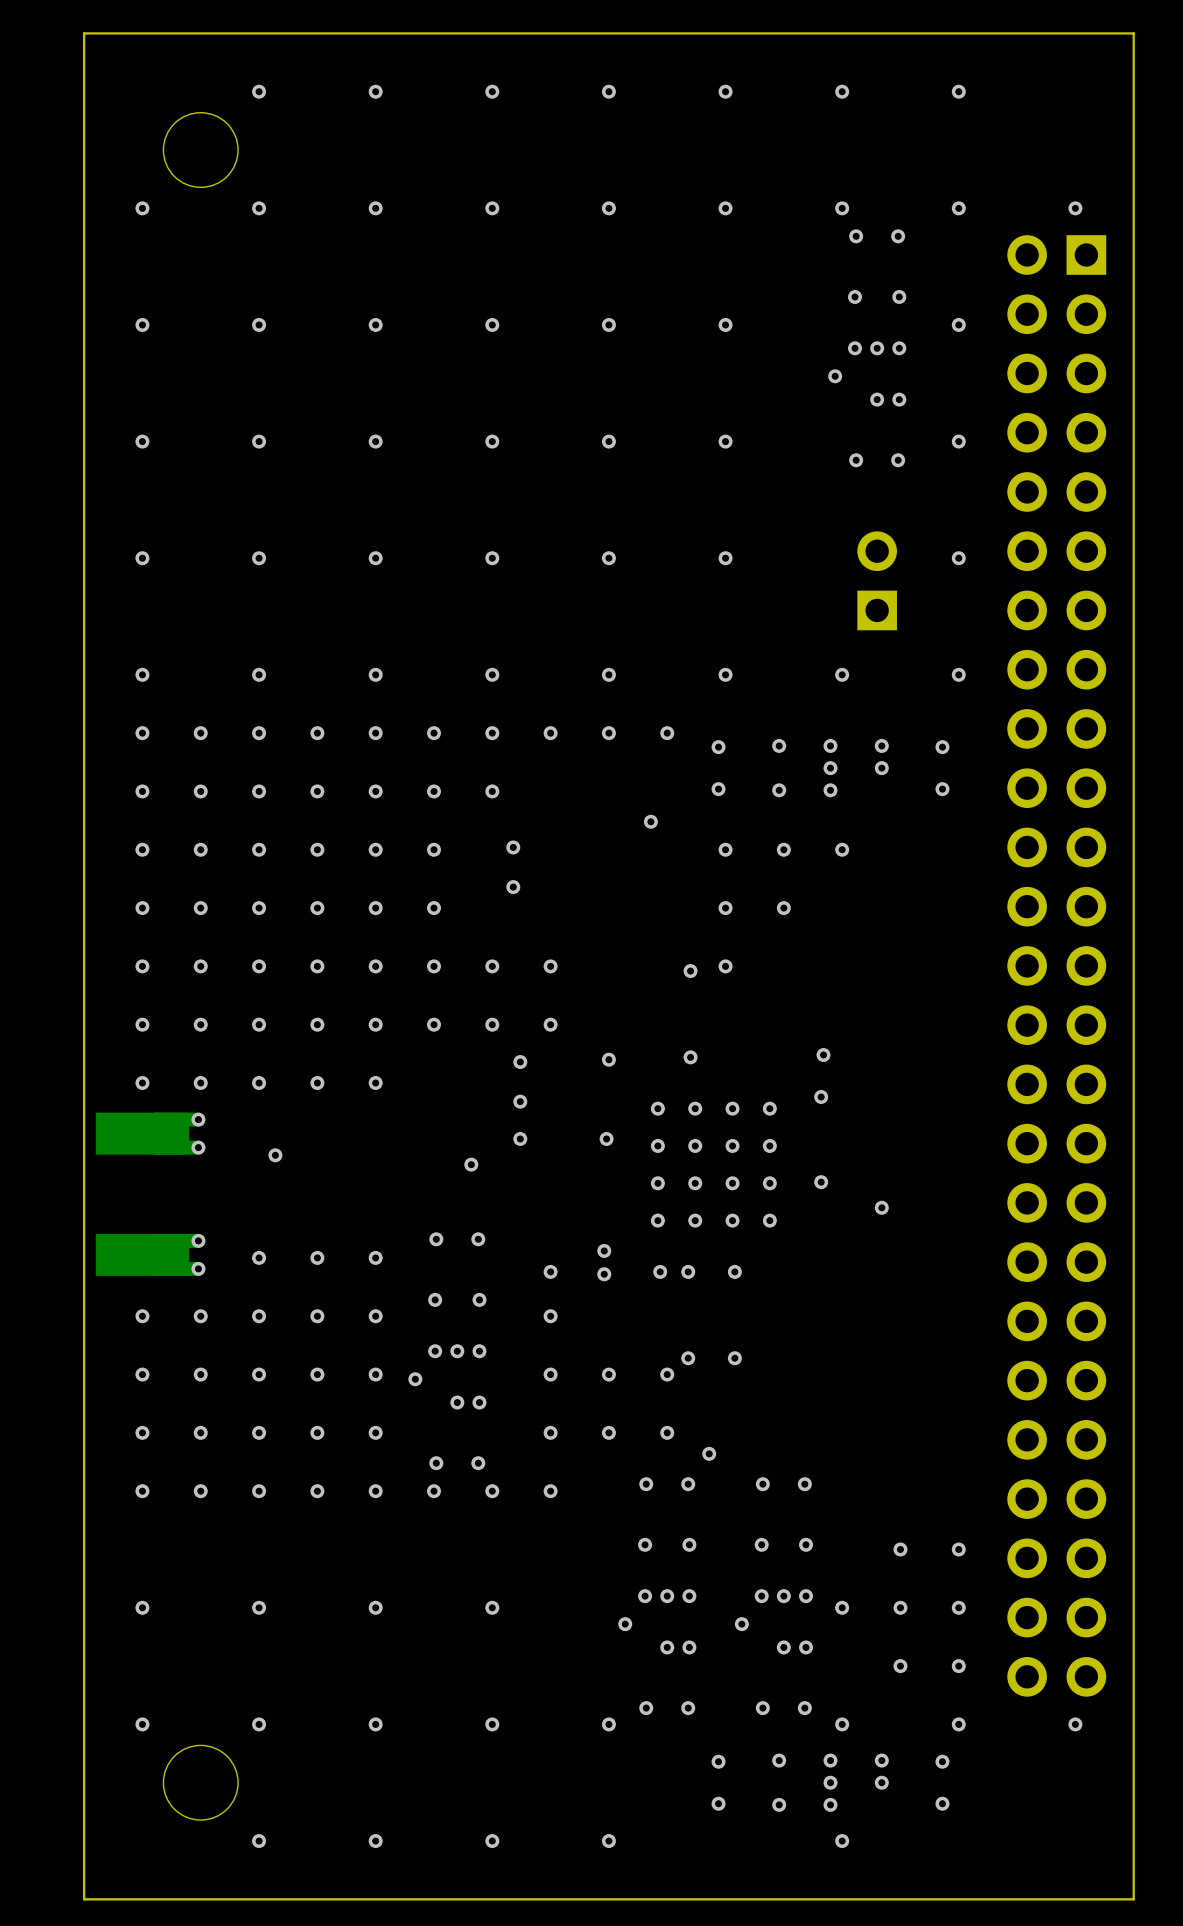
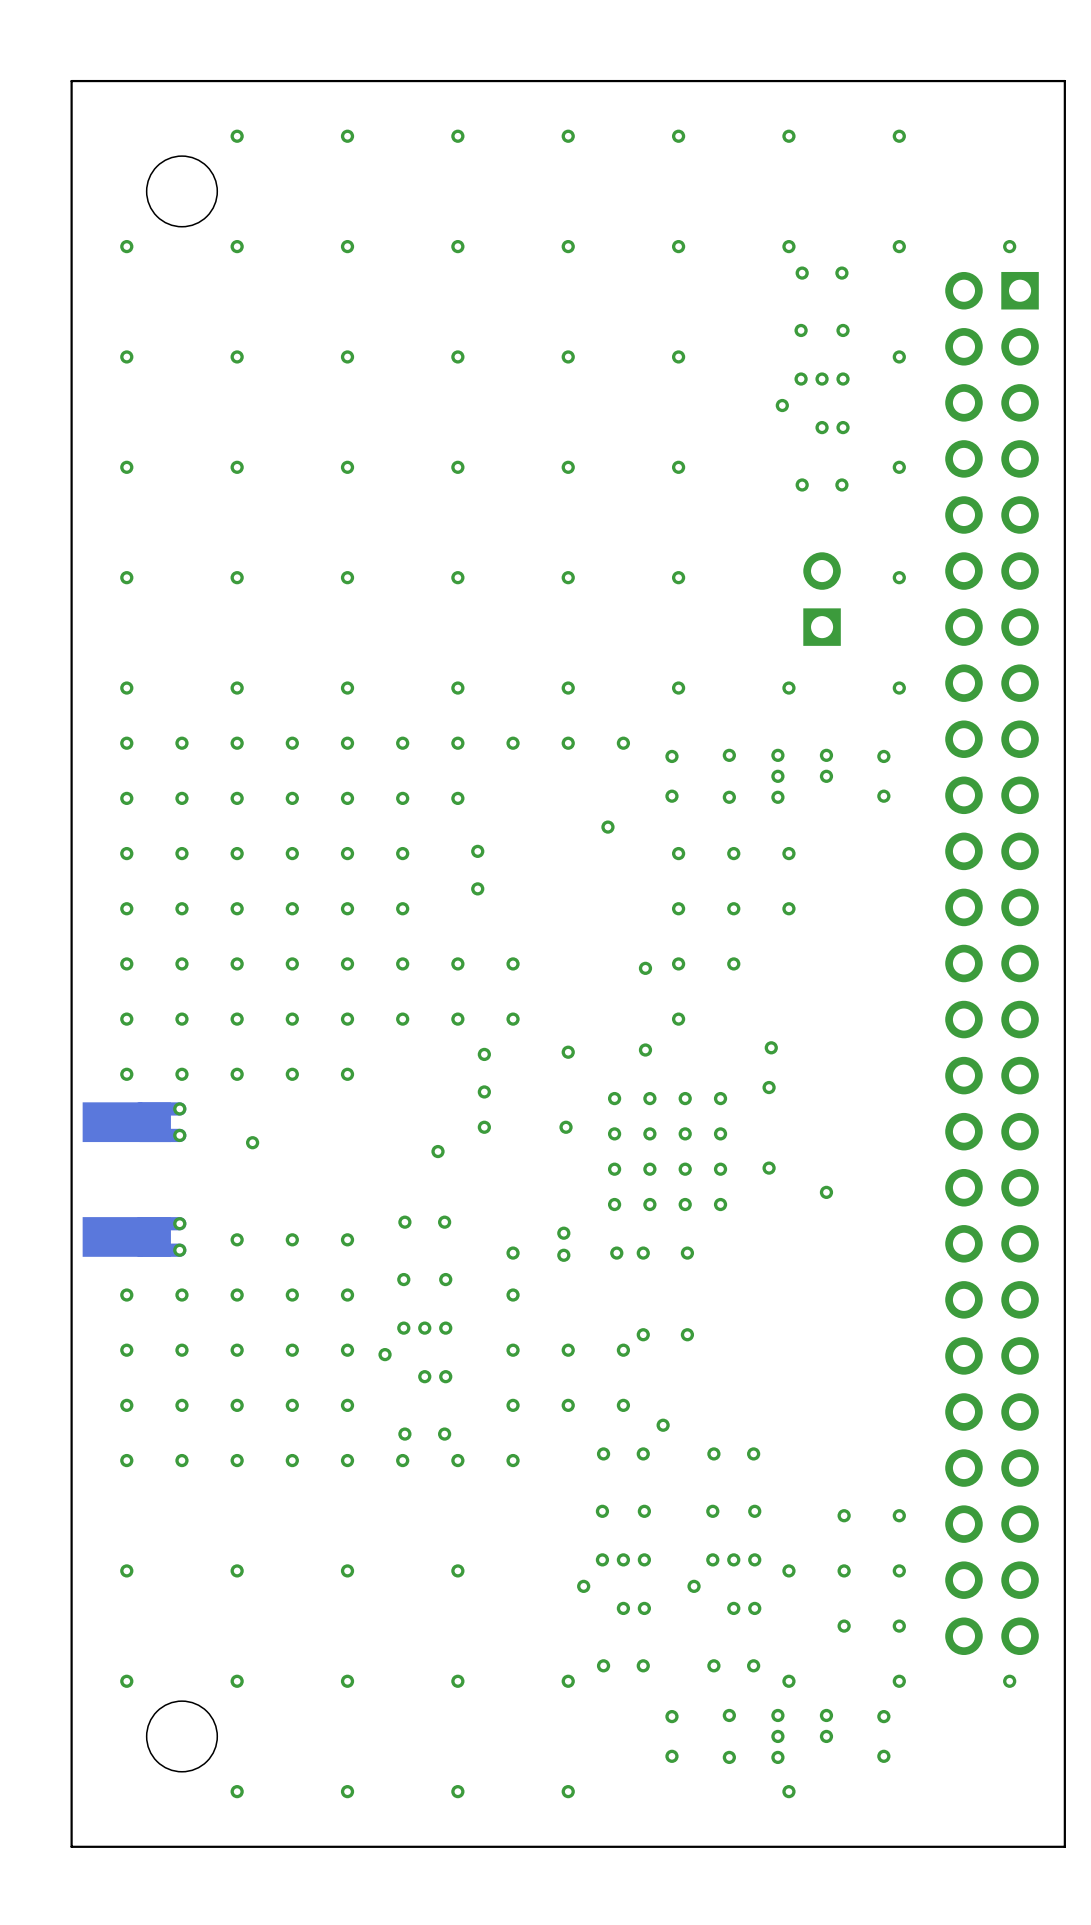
via: none -> (788, 908)
via: none -> (733, 963)
via: none -> (678, 1019)

